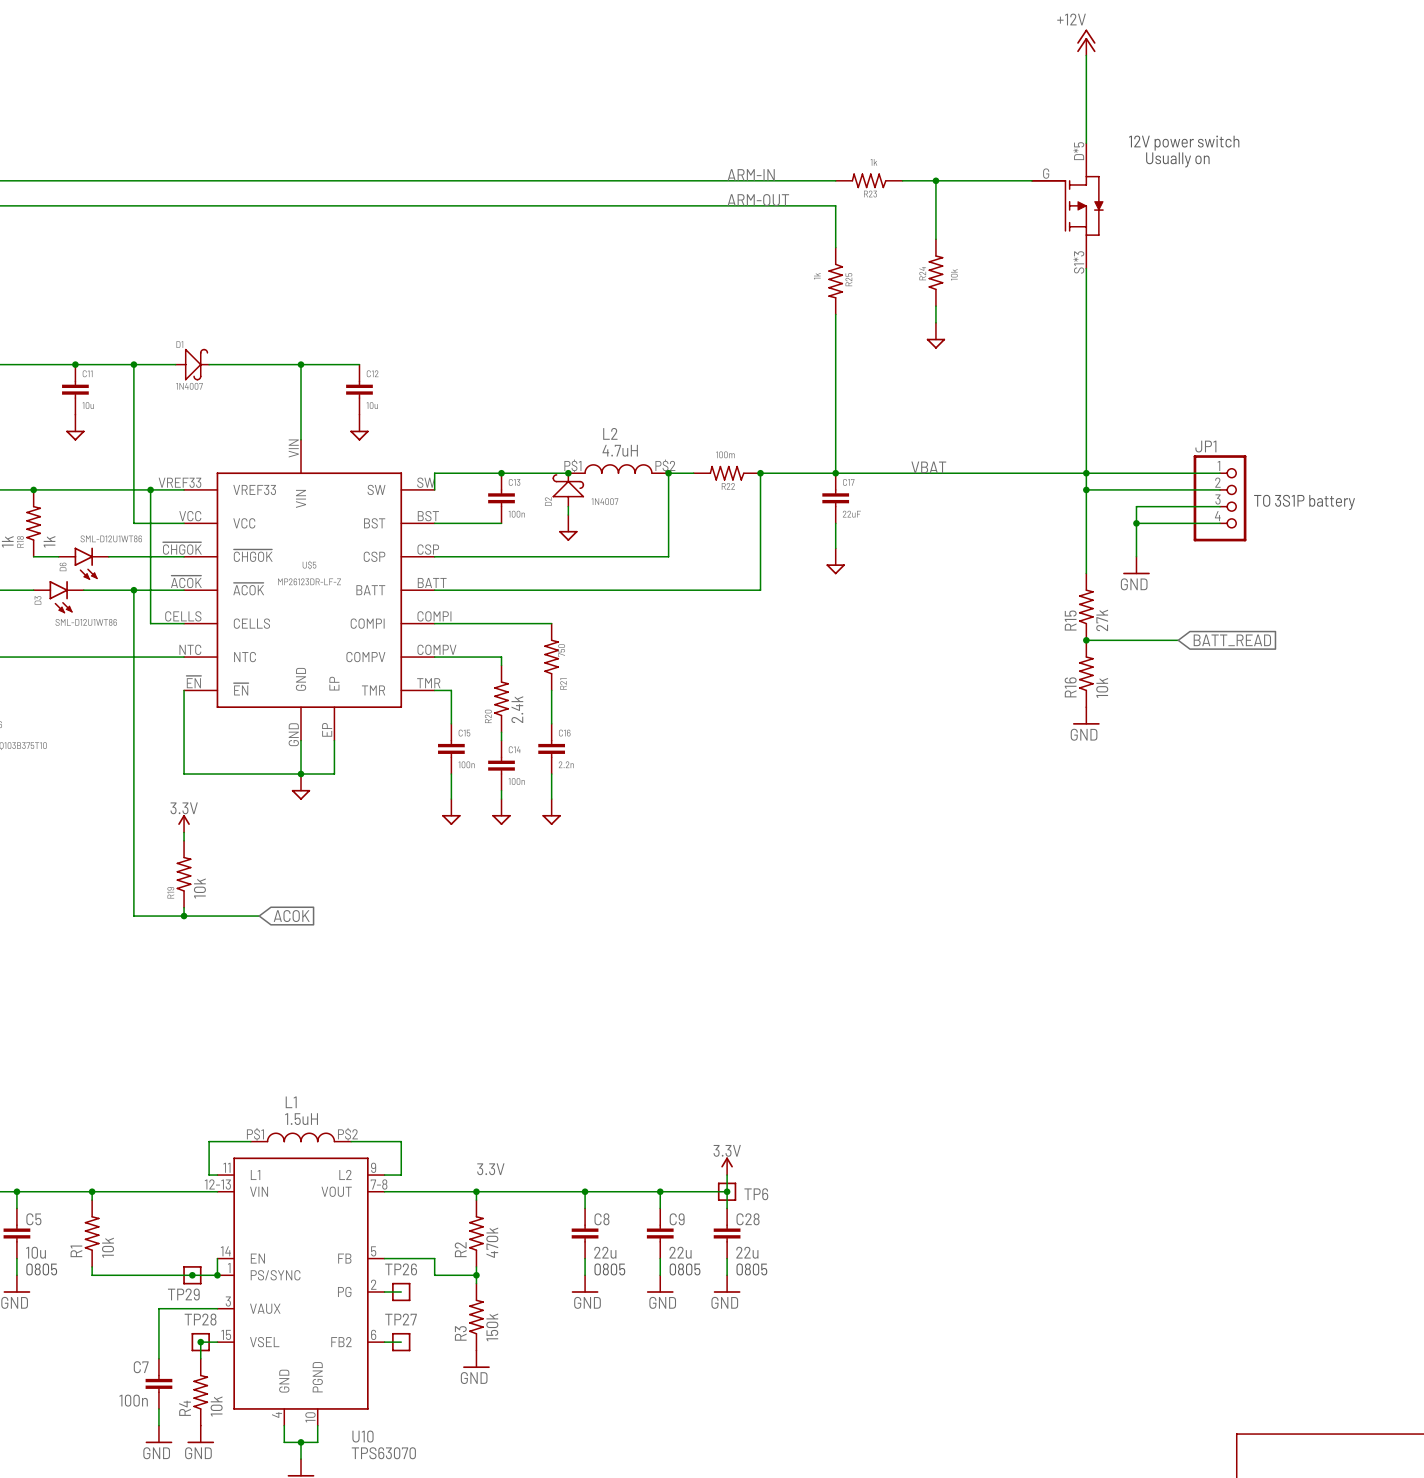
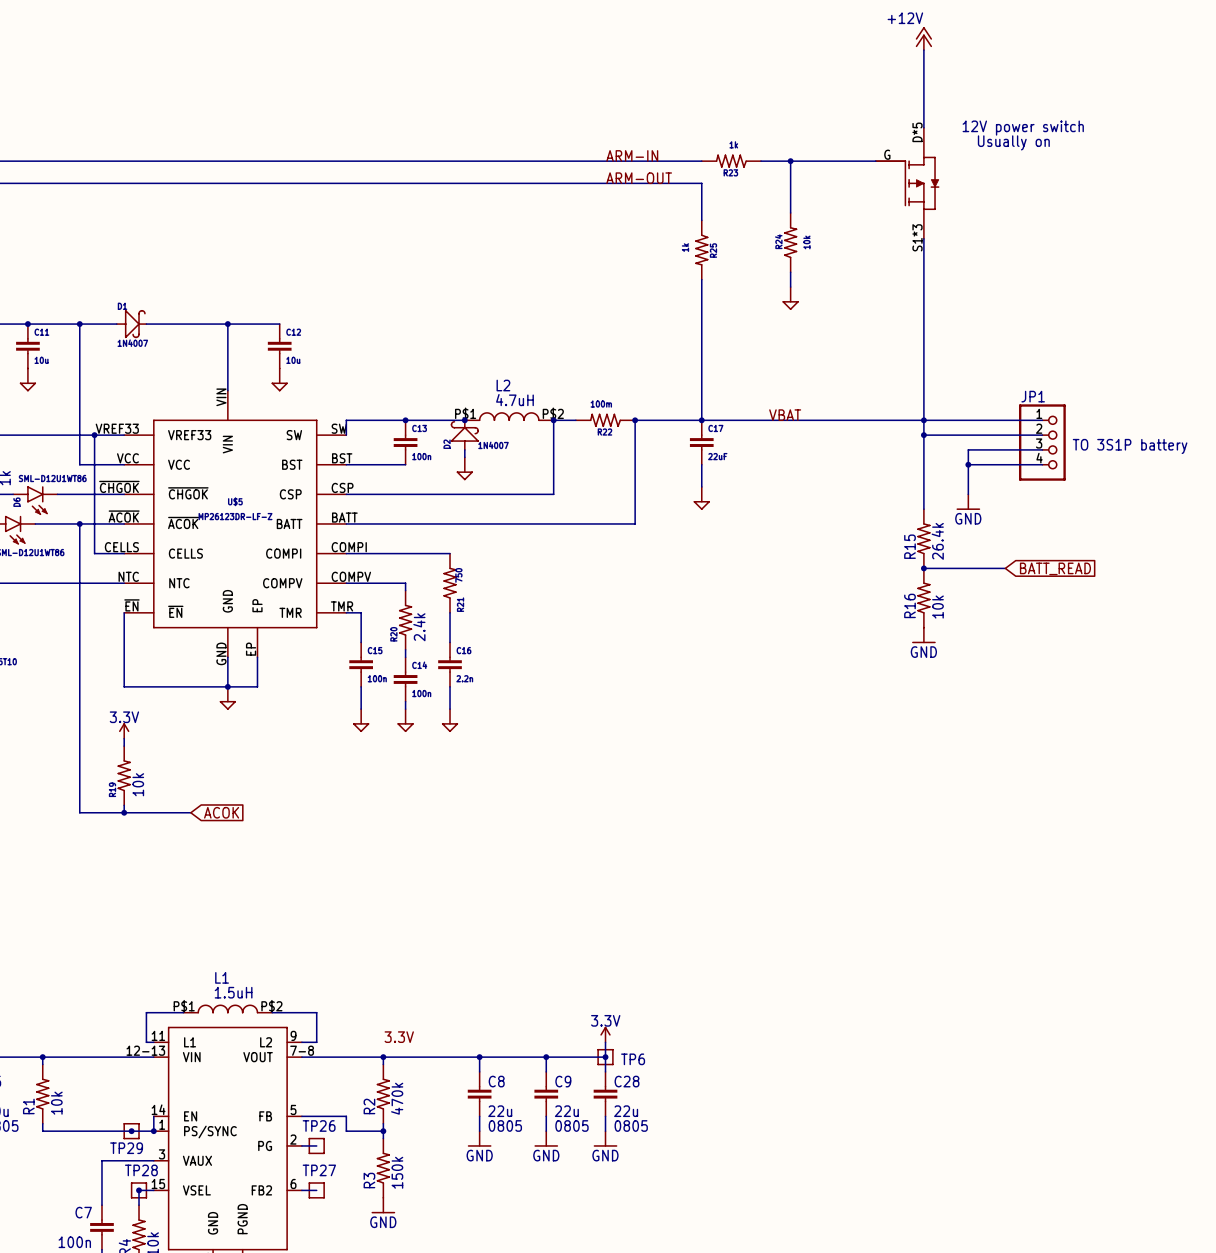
R15 value: 27k (1102, 620) -> 26.4k (937, 541)

